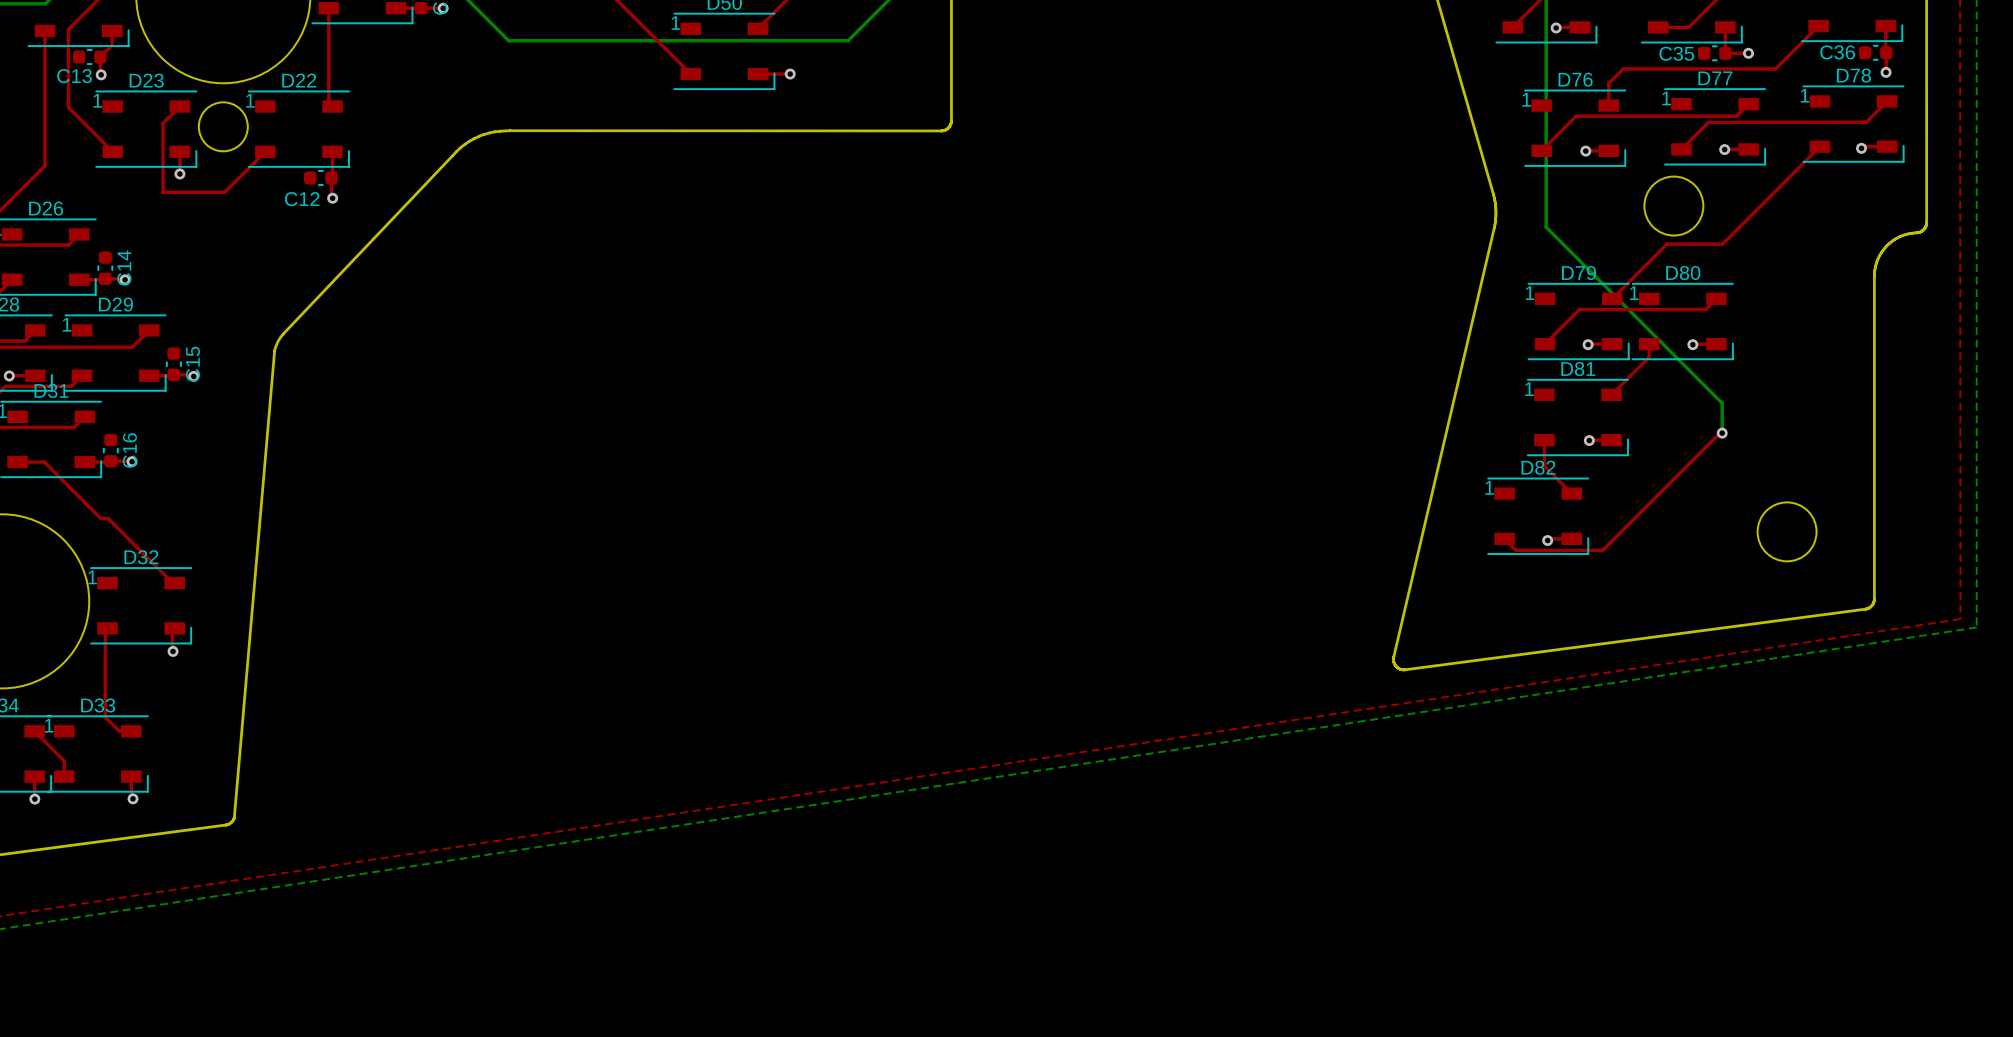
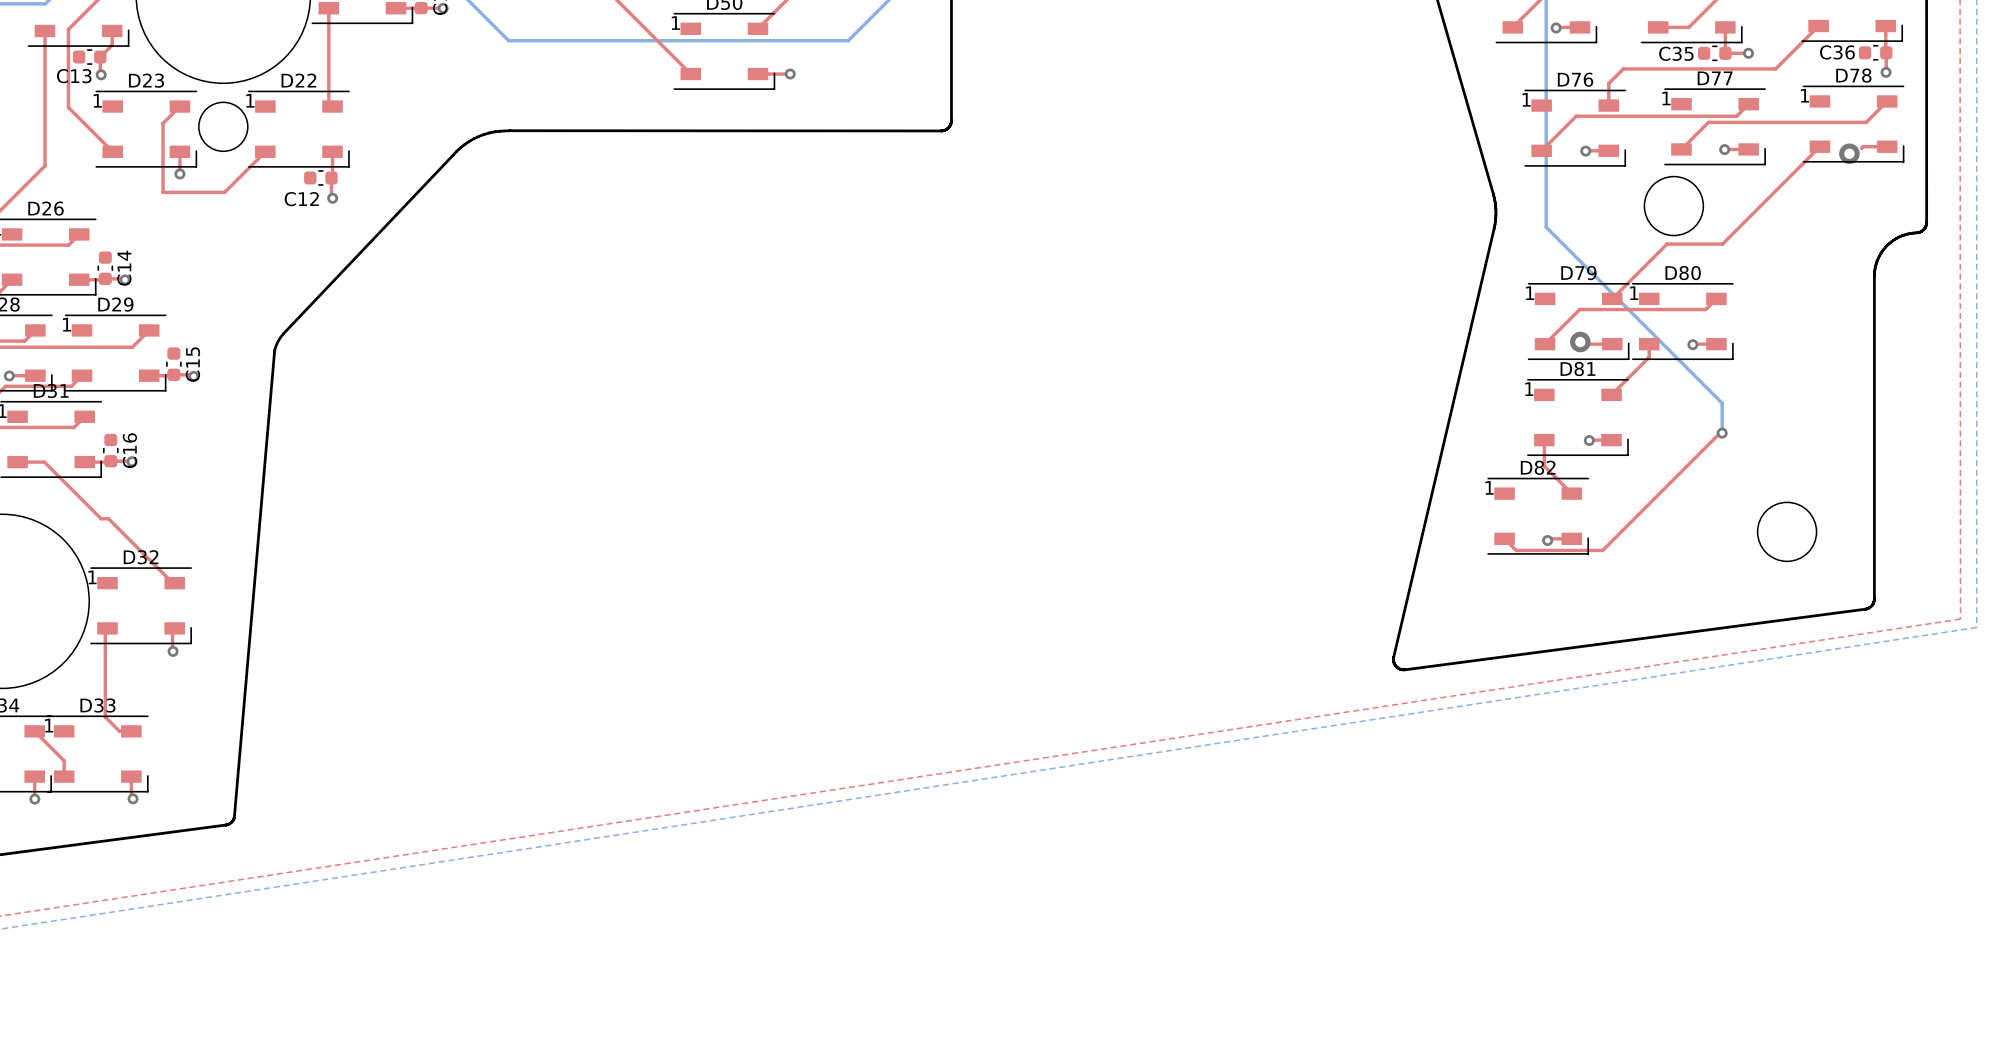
via size: [1856, 142, 1867, 154] -> [1839, 143, 1860, 165]
via size: [1582, 339, 1594, 351] -> [1570, 331, 1591, 353]

